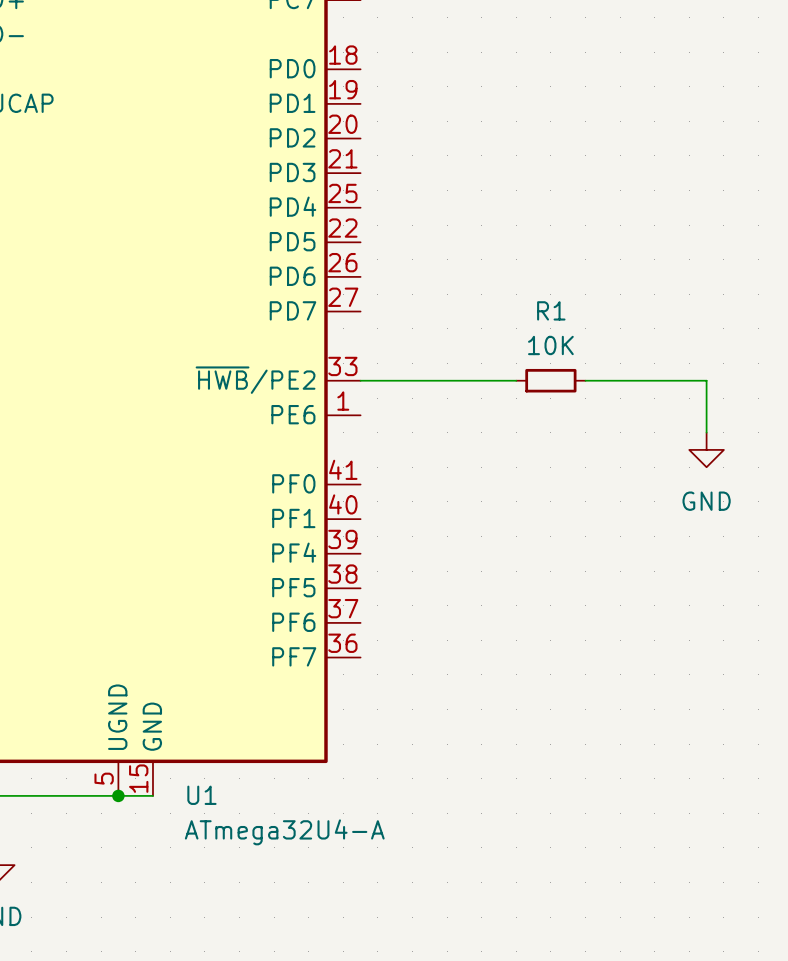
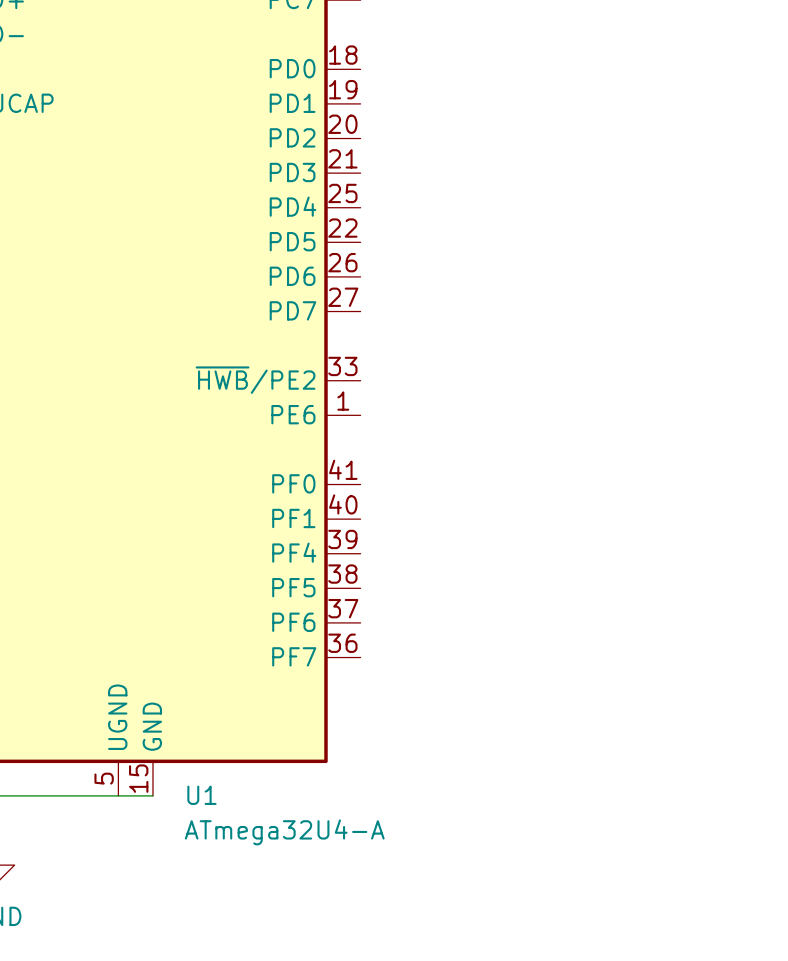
wire: (360, 380) (516, 380) -> none
R1: 10K (550, 380) -> none
wire: (585, 380) (706, 380) (706, 432) -> none
power symbol: GND (706, 449) -> none
junction: (118, 795) -> none

